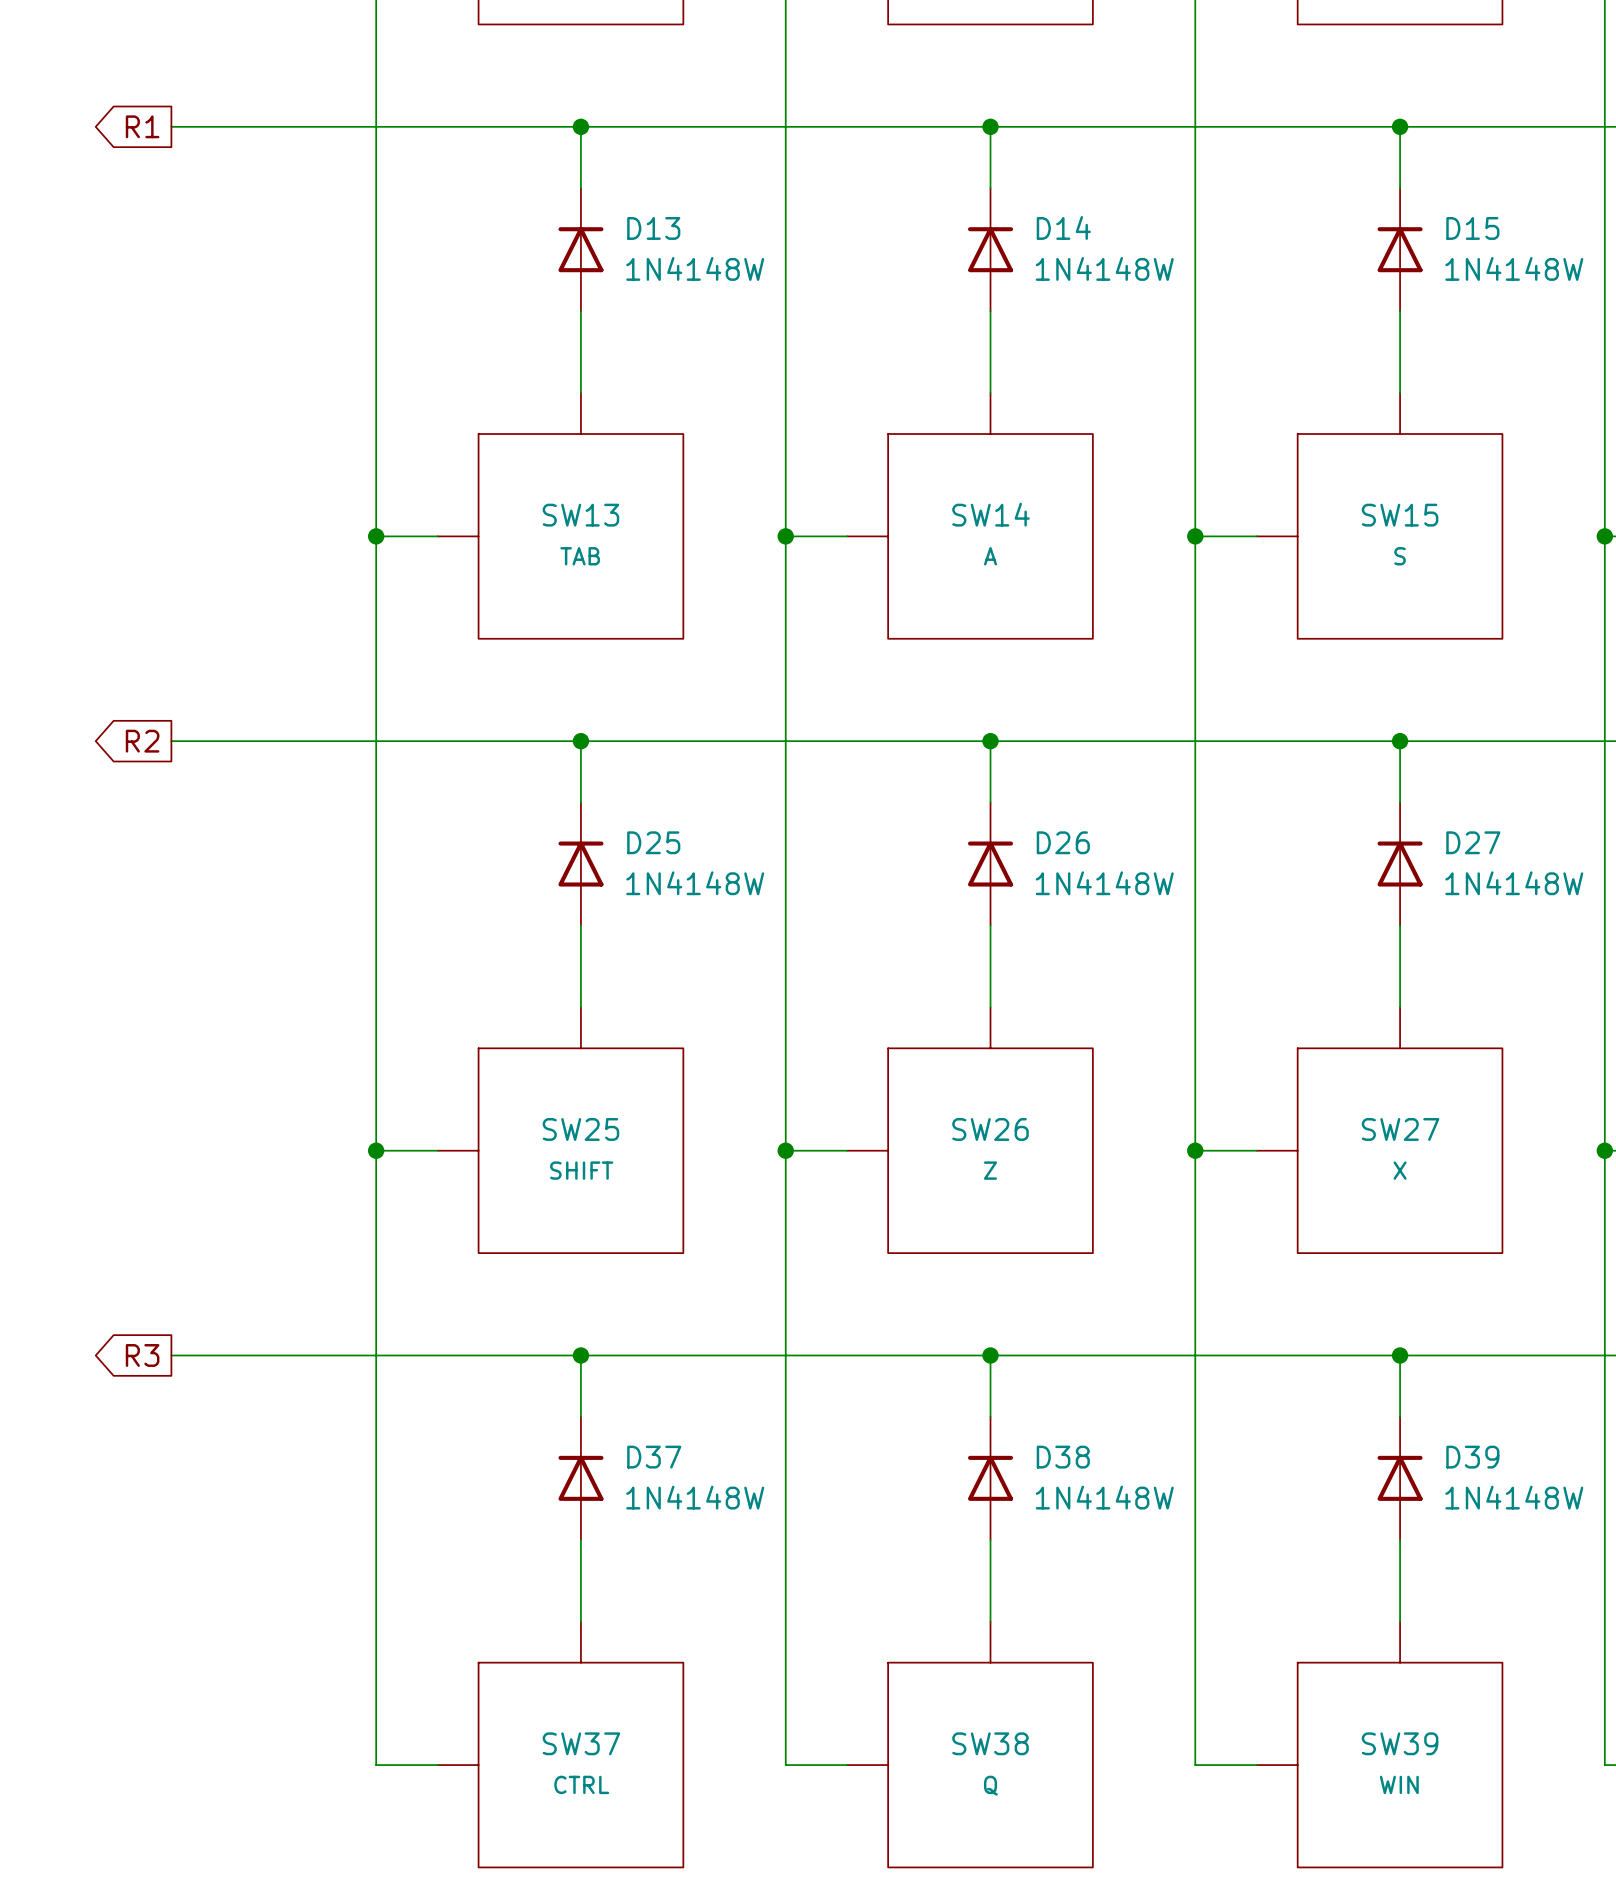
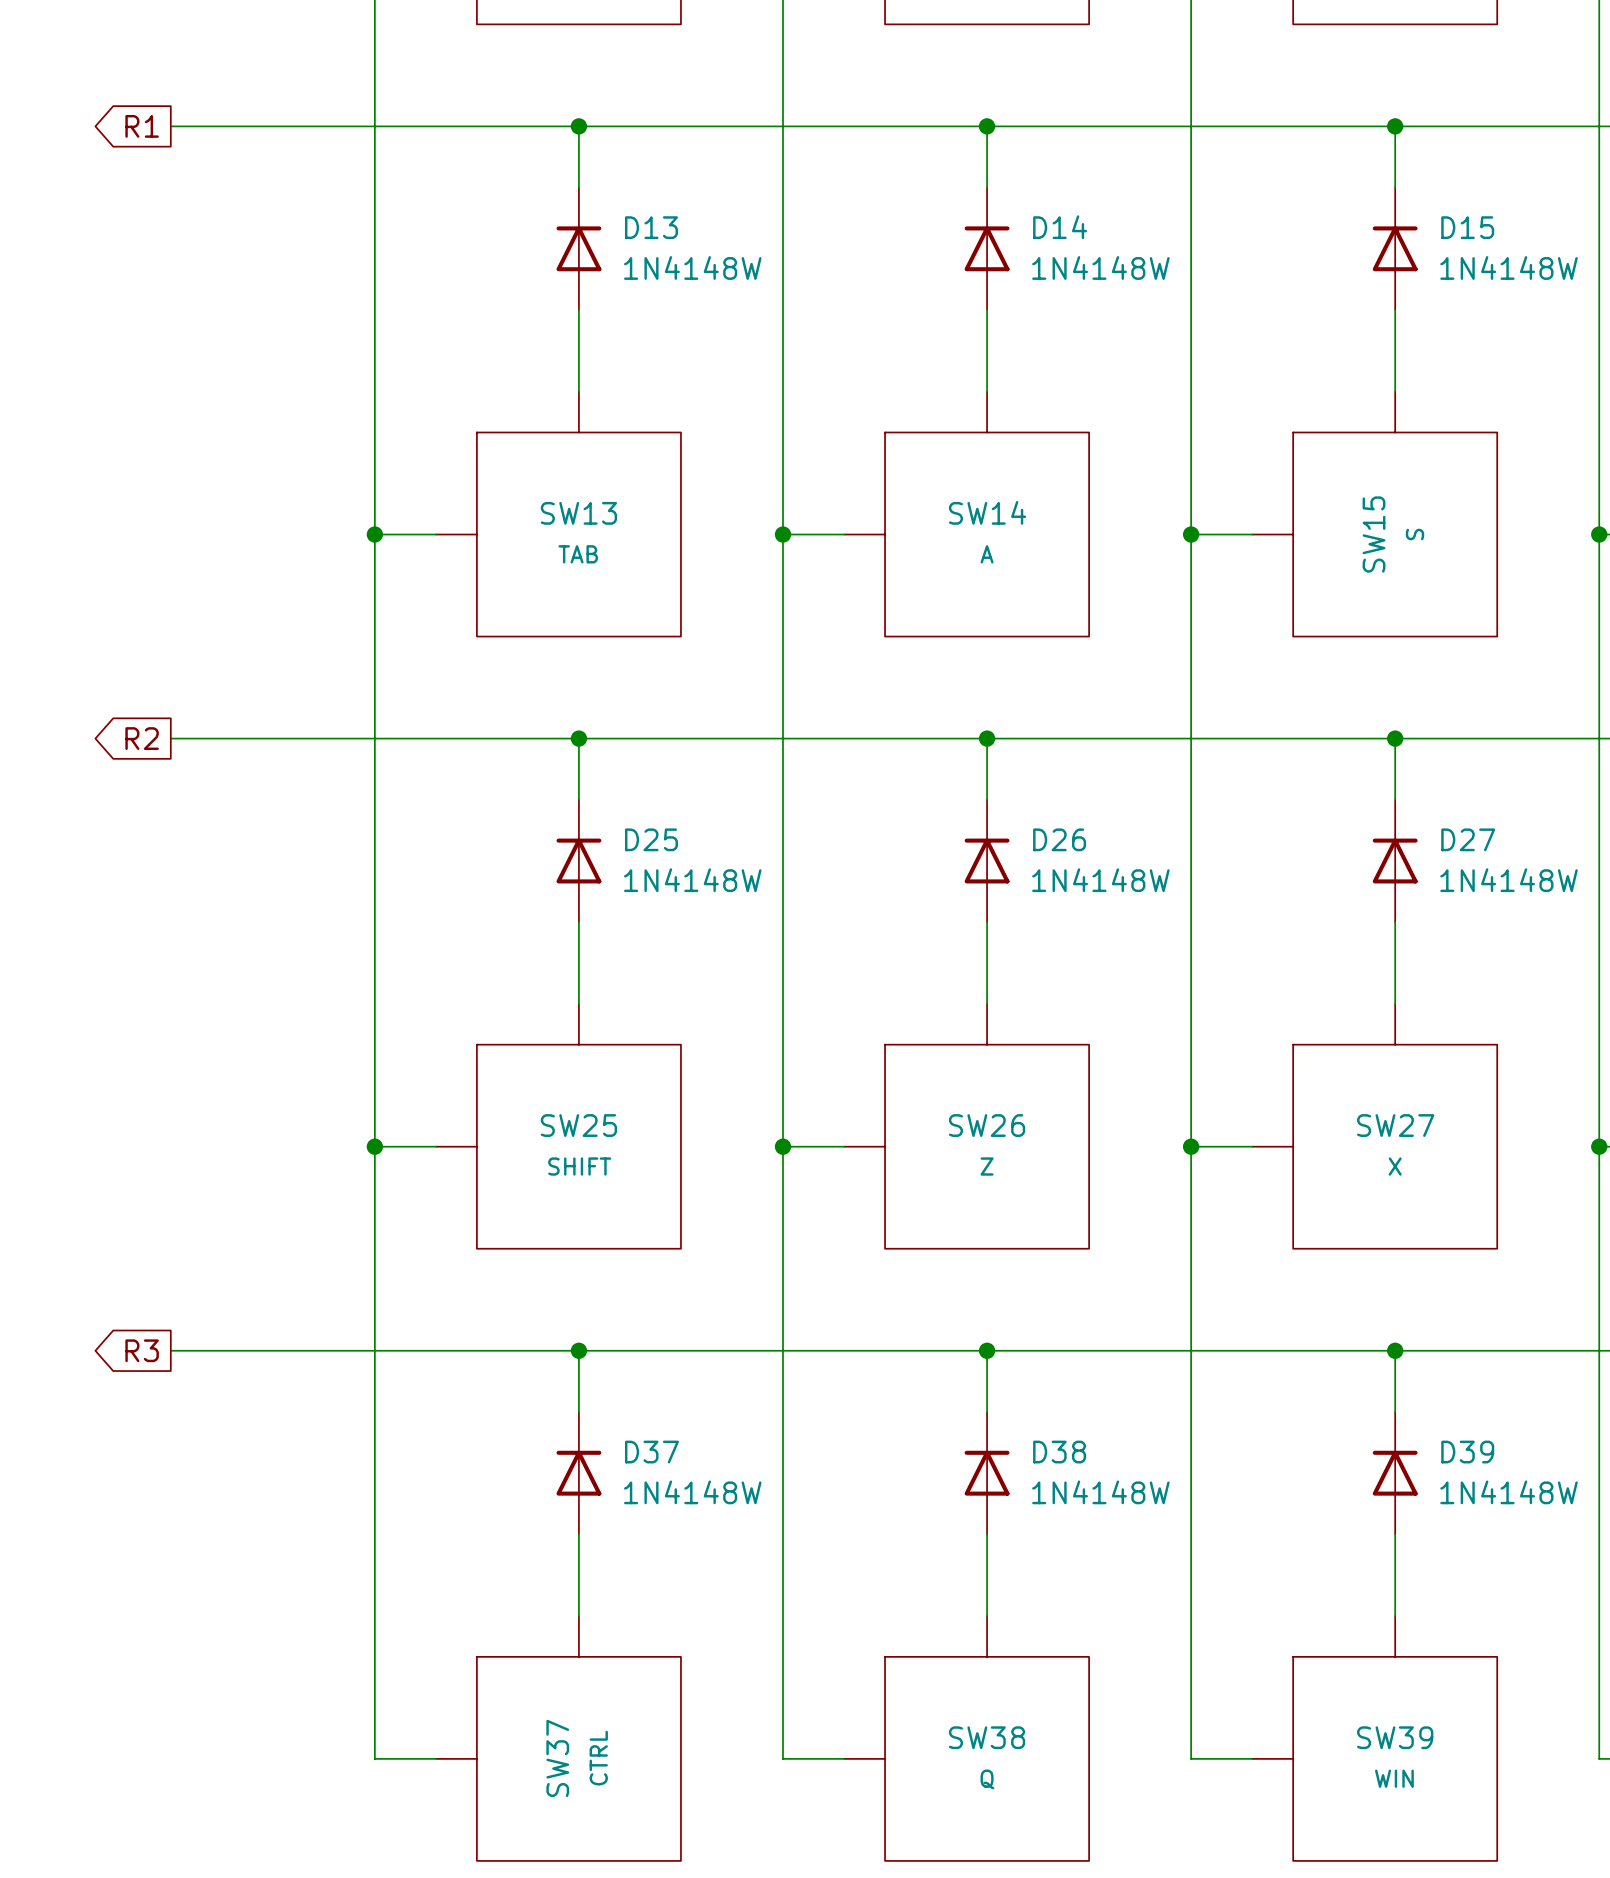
SW15 name rotation: 0° (1400, 515) -> 90° counterclockwise (1374, 534)
SW15 value rotation: 0° (1400, 556) -> 90° counterclockwise (1414, 534)
SW37 name rotation: 0° (581, 1743) -> 90° counterclockwise (557, 1758)
SW37 value rotation: 0° (581, 1784) -> 90° counterclockwise (598, 1758)

